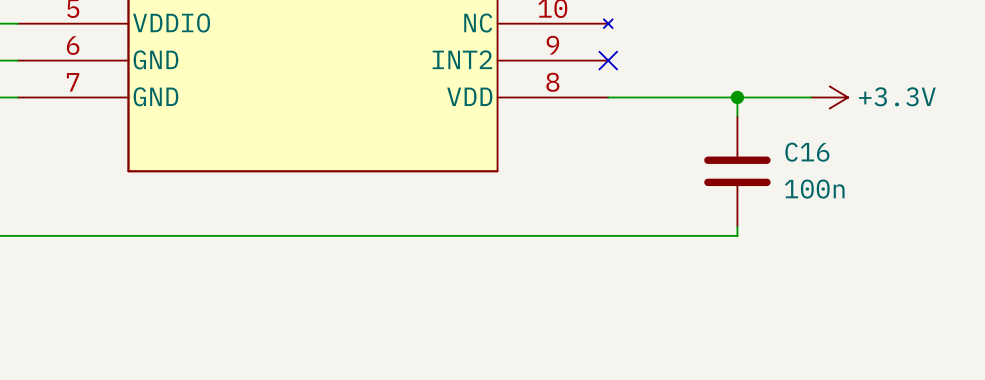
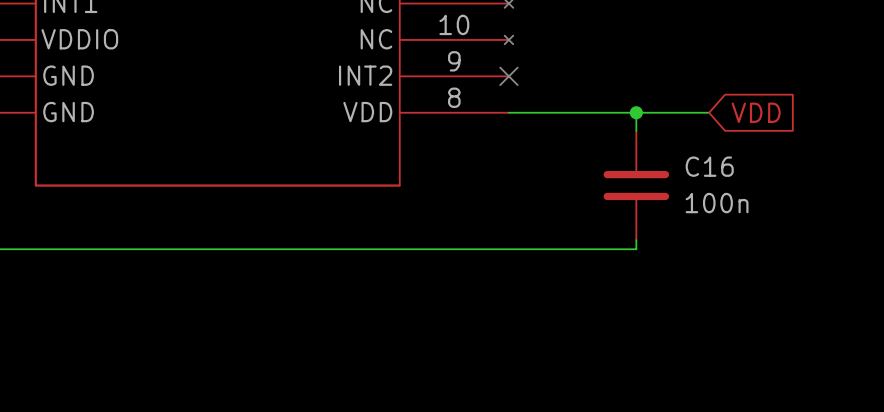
power symbol: +3.3V (829, 97) -> none
global label: none -> VDD (756, 112)

